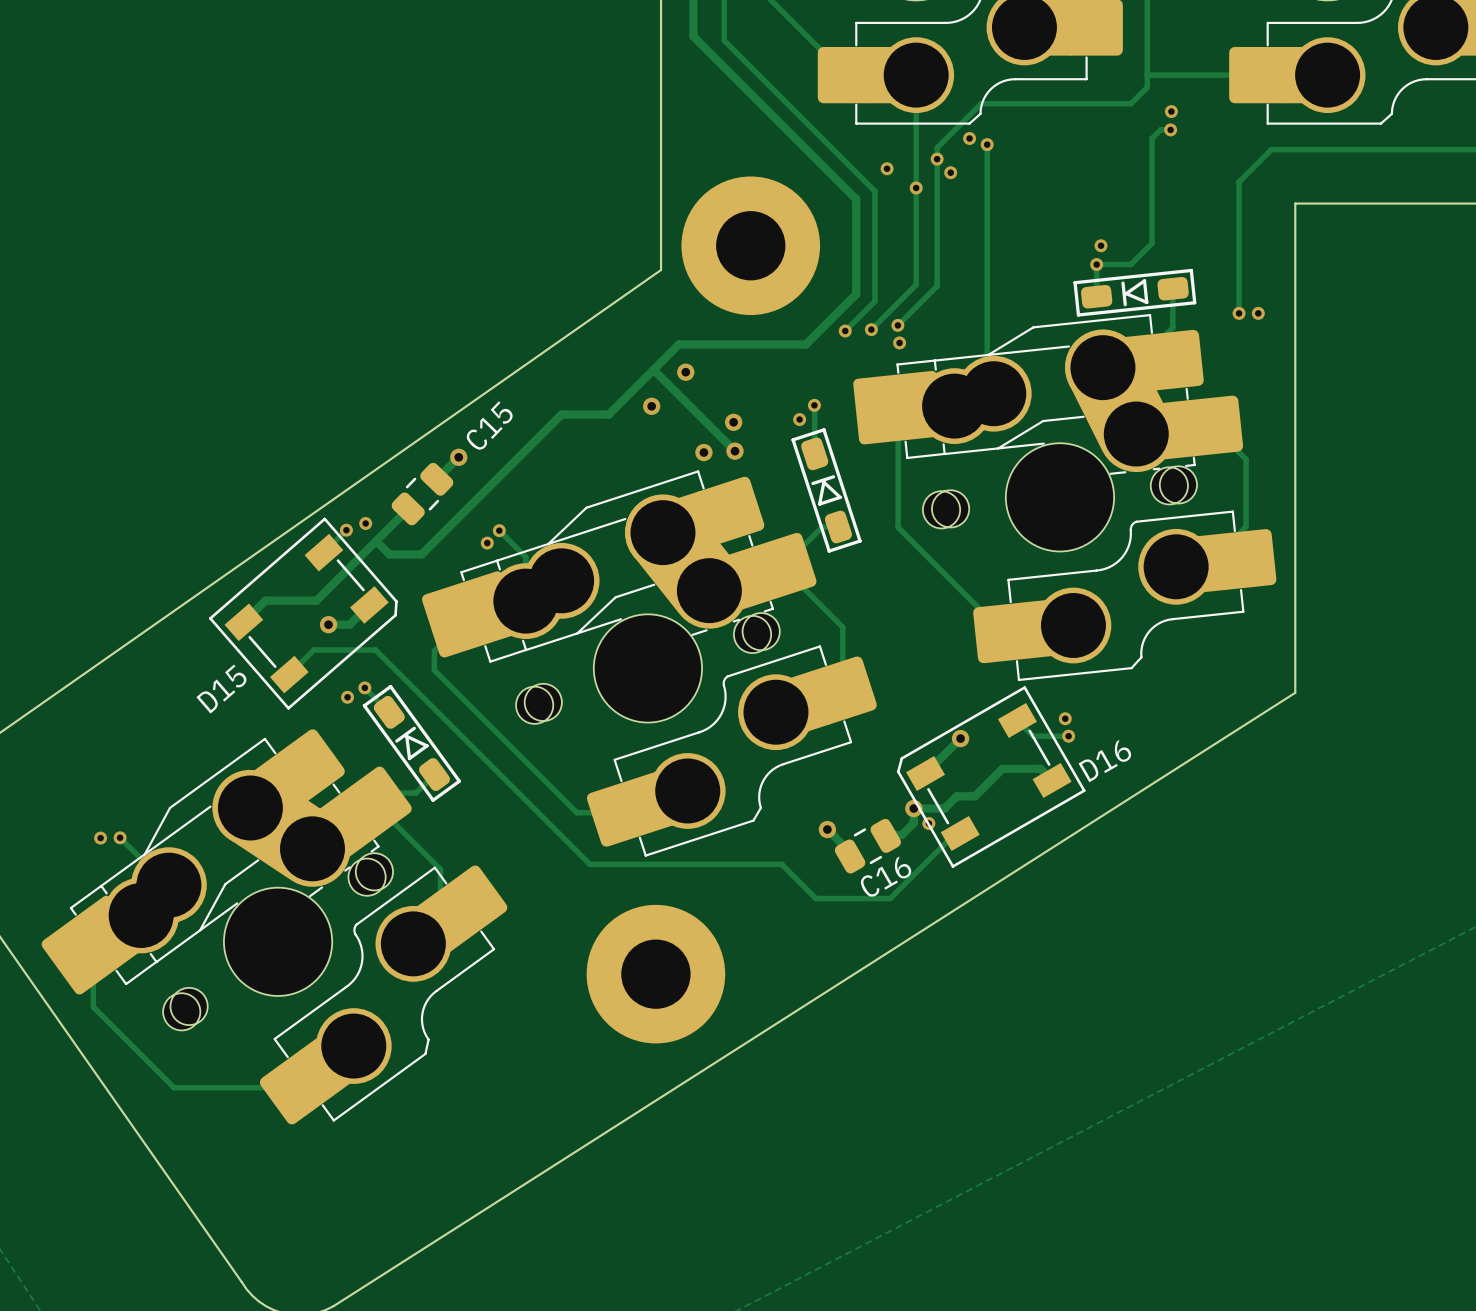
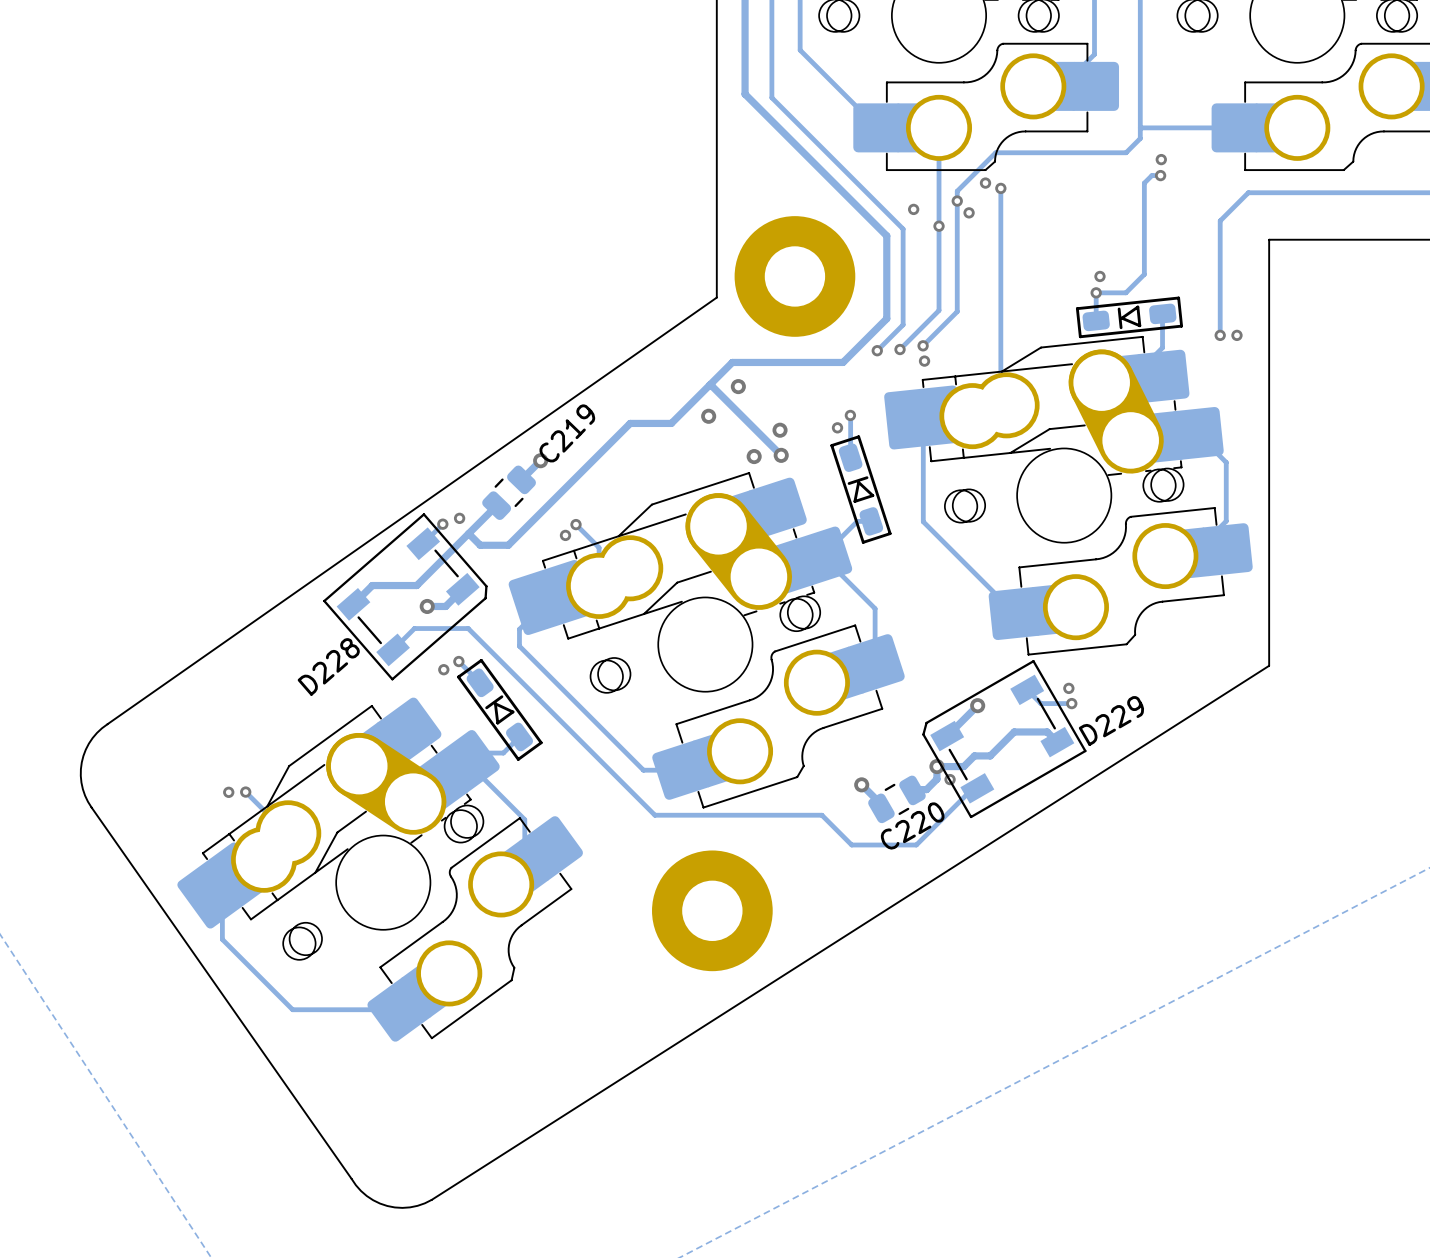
C15 name: C15 (489, 425) -> C219 (567, 433)
D15 name: D15 (221, 689) -> D228 (328, 666)
D16 name: D16 (1104, 761) -> D229 (1111, 720)
C16 name: C16 (886, 877) -> C220 (912, 825)

